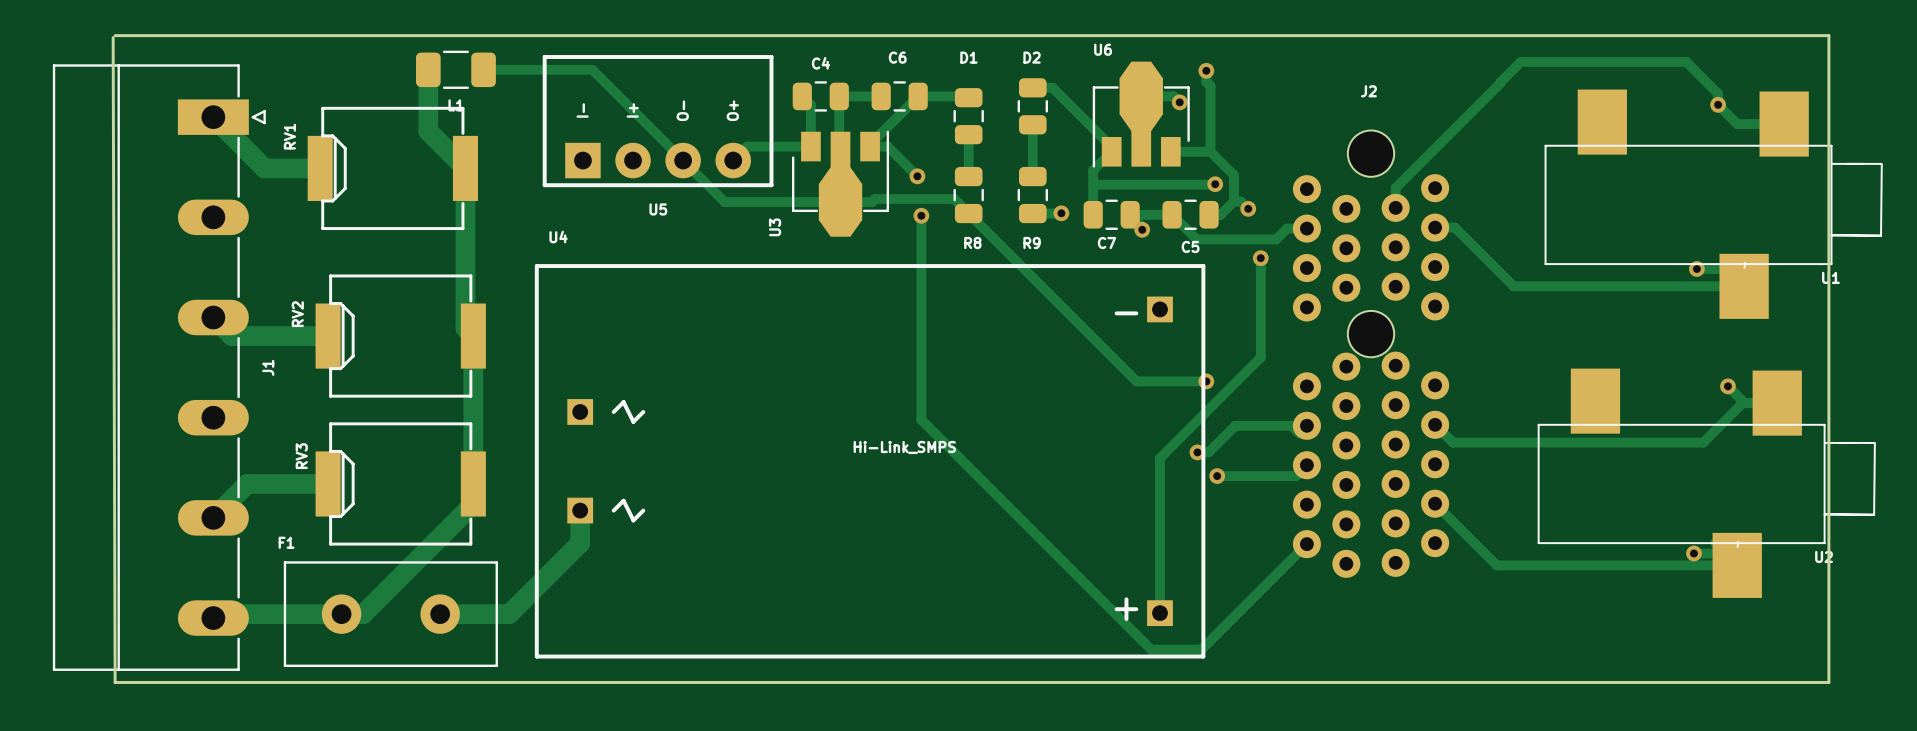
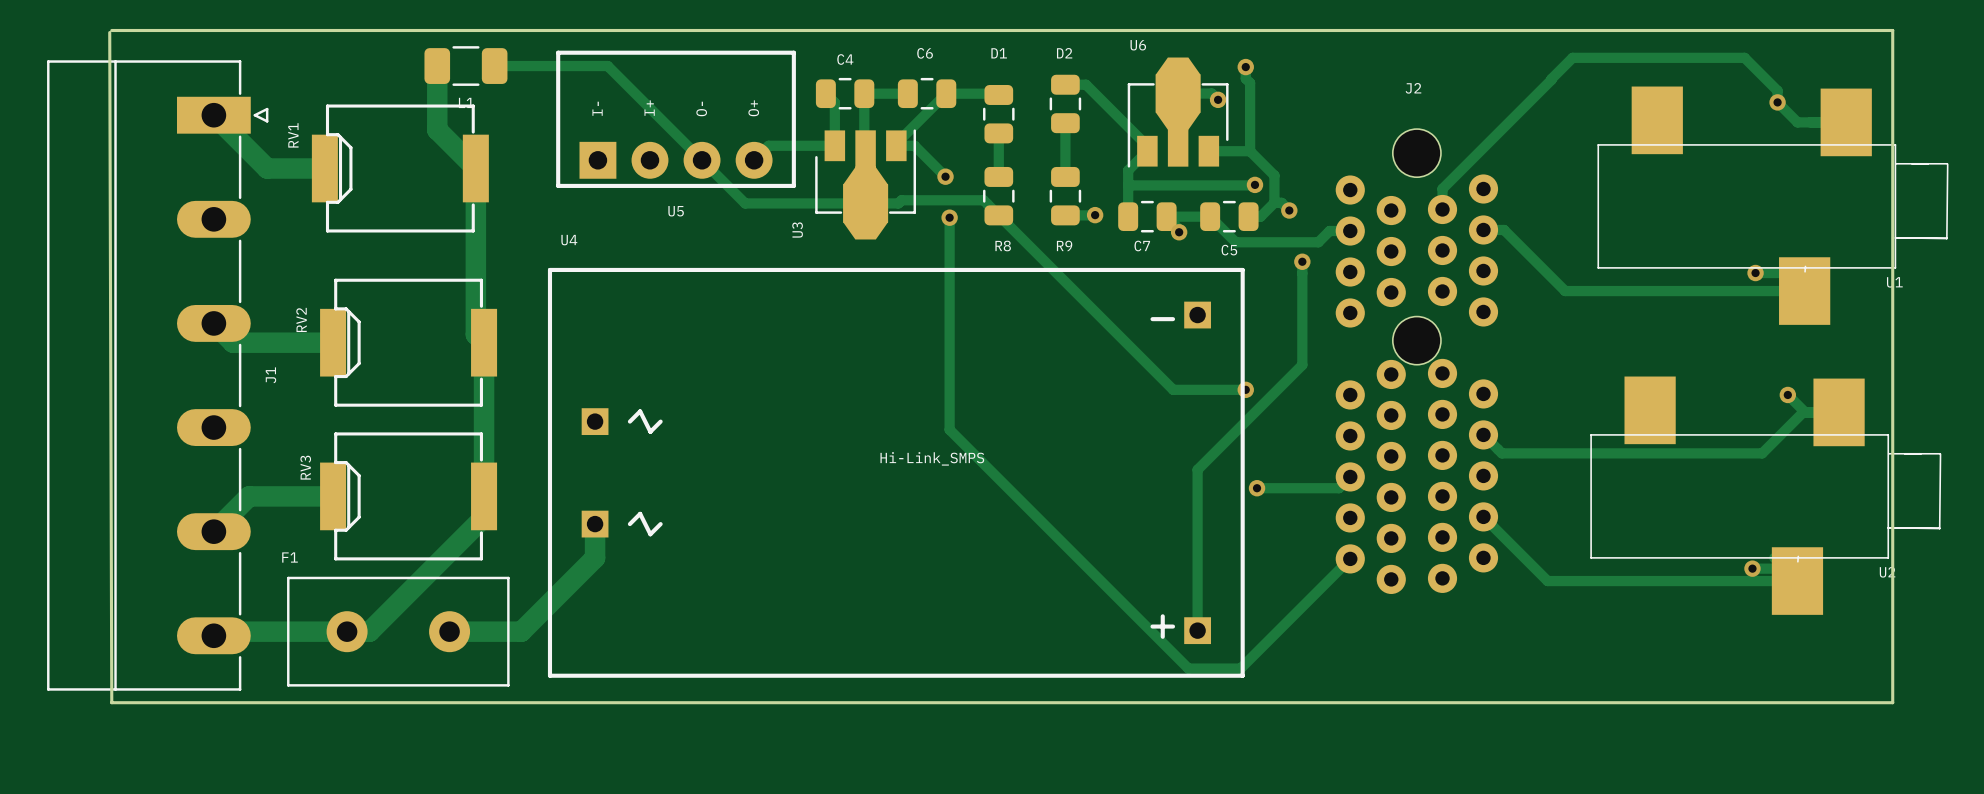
track: (1299, 433) (1291, 425) (1235, 425) (1208, 452) (1197, 452) -> none
via: (1197, 452) -> none

